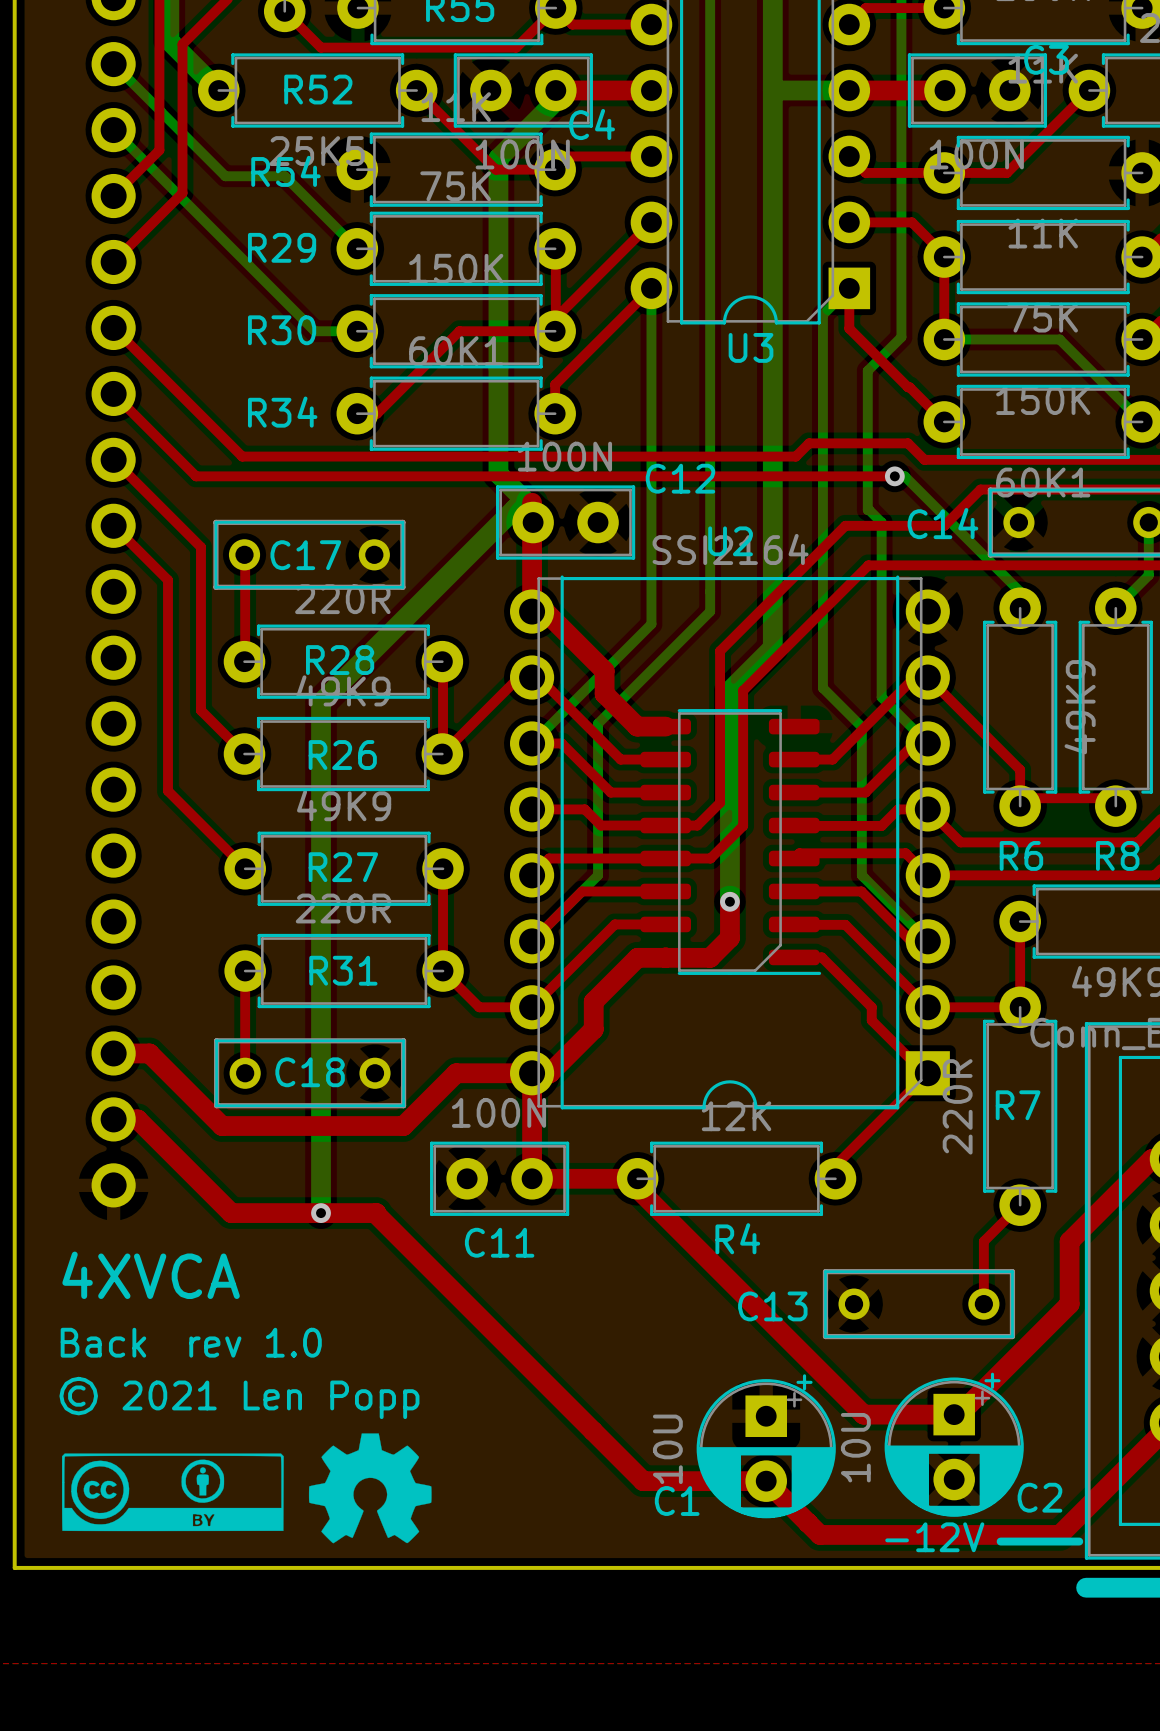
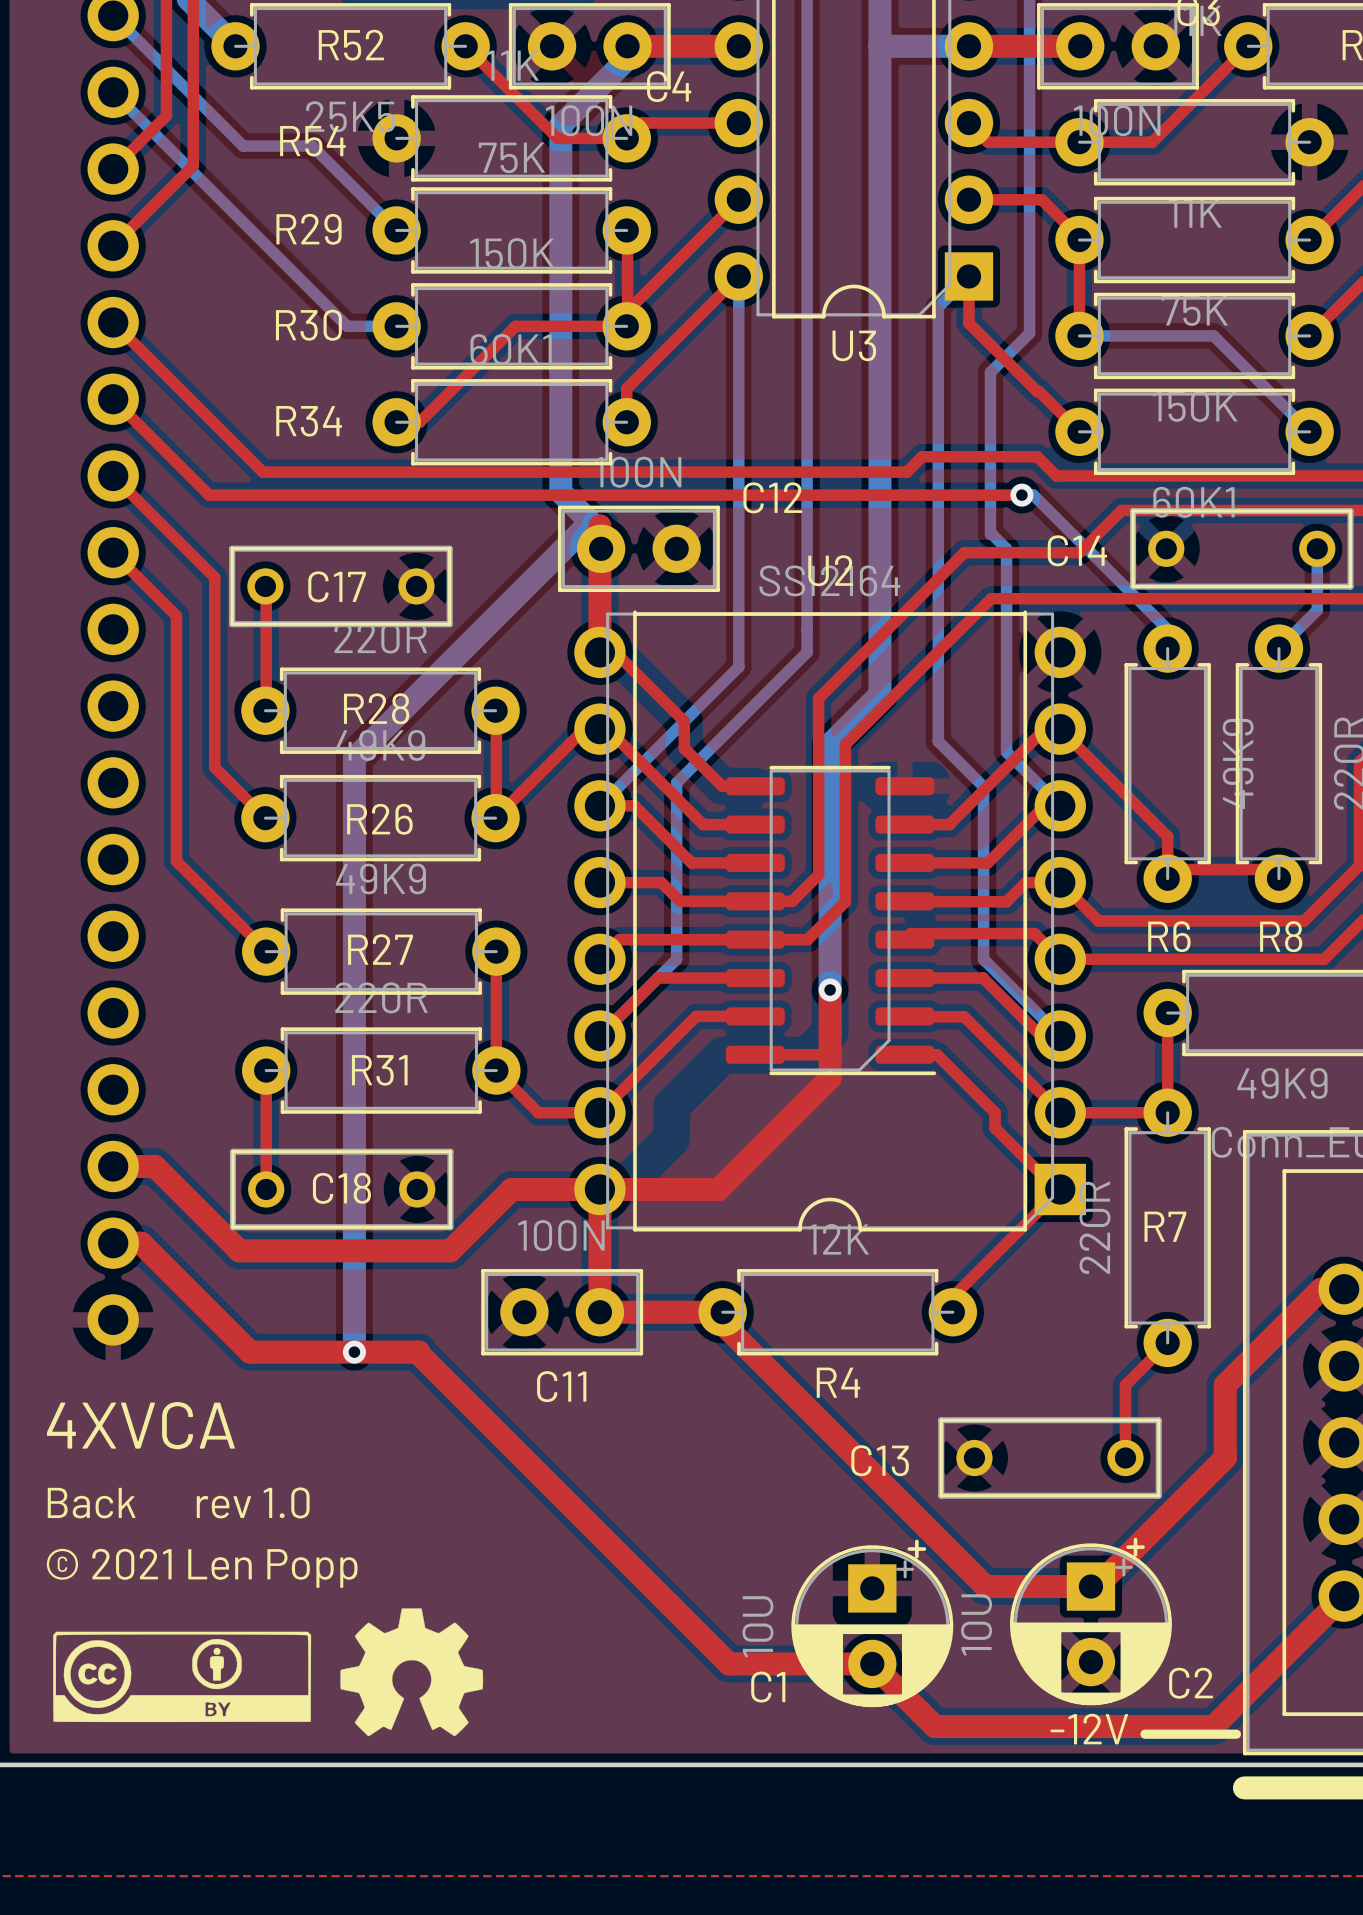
top track width: thick (532, 611) (545, 611) (604, 670) (604, 694) (637, 726) (665, 726) -> thin (599, 652) (615, 652) (684, 721) (684, 748) (722, 786) (755, 786)
top track: (729, 938) (710, 957) (637, 957) (593, 1001) (593, 1029) (549, 1073) -> (830, 1032) (830, 1078) (718, 1189) (620, 1189)
top track: none -> (755, 1054) (830, 1055)

